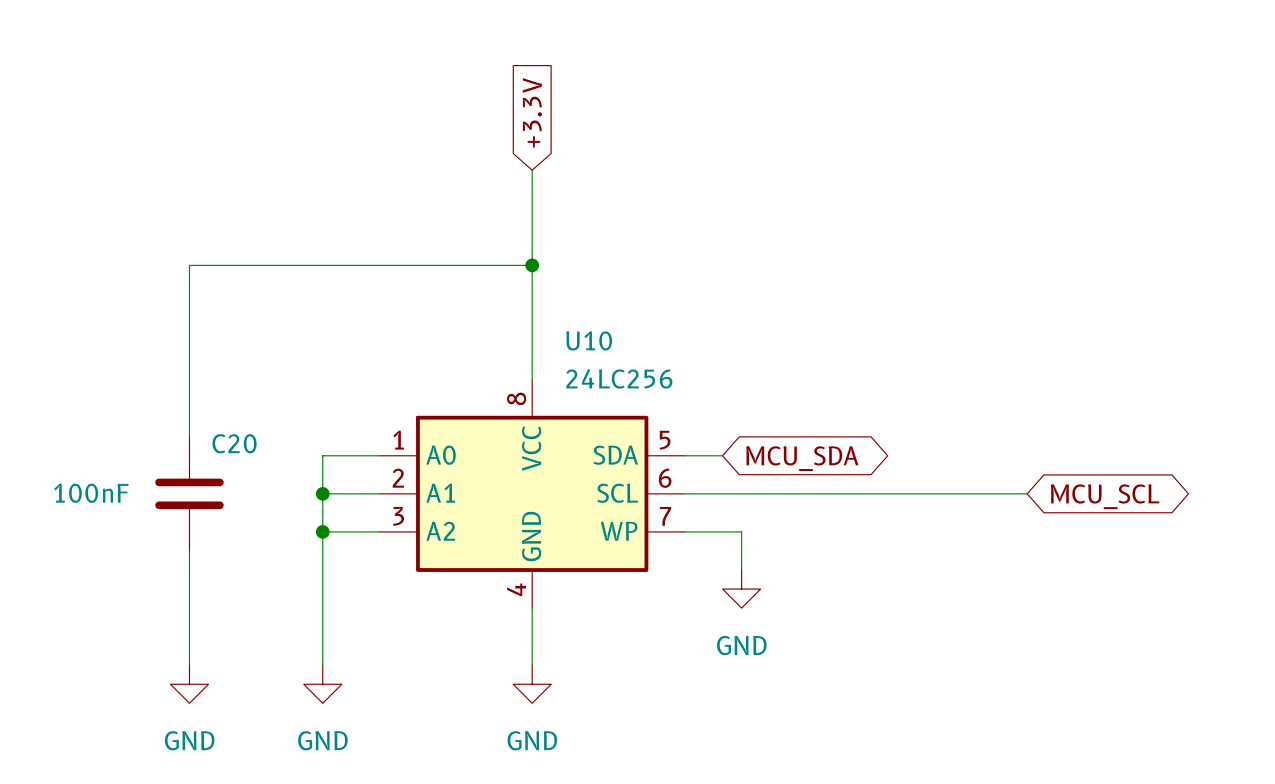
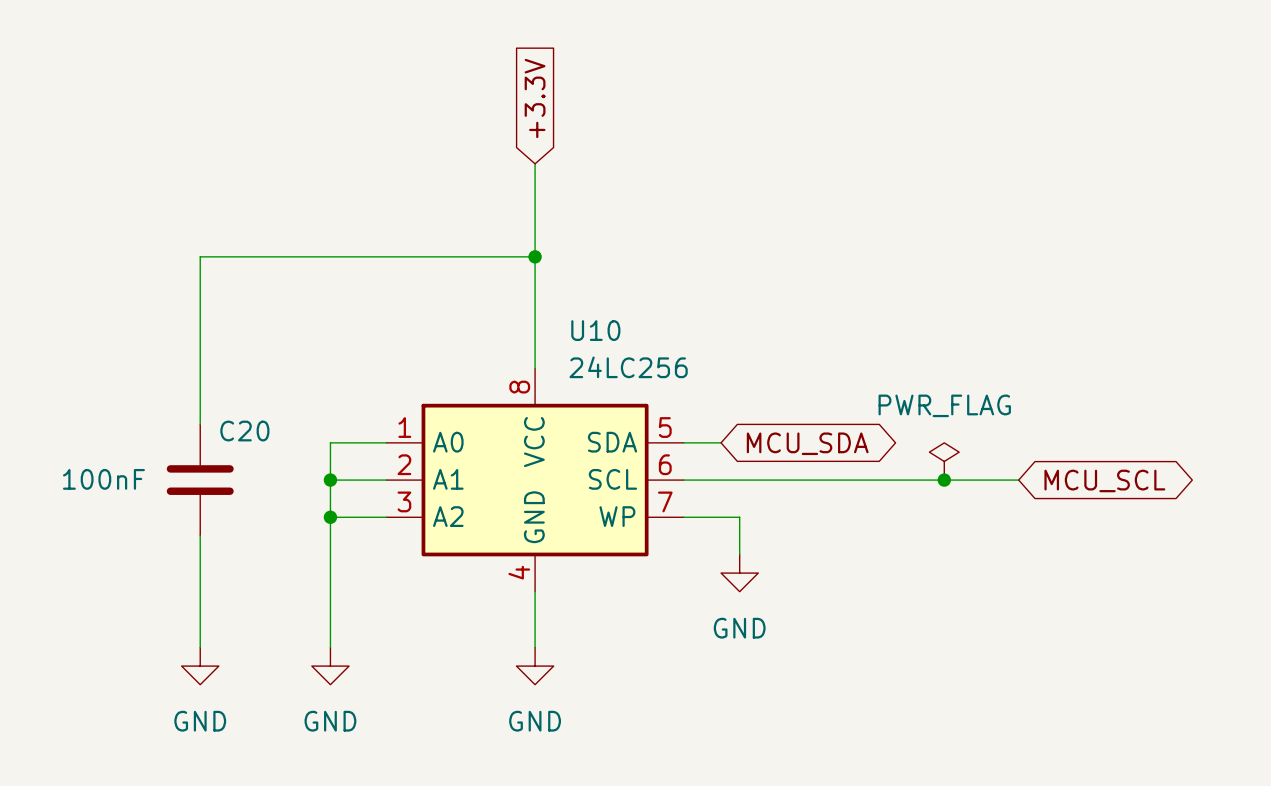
power symbol: none -> PWR_FLAG (944, 461)
junction: none -> (944, 480)

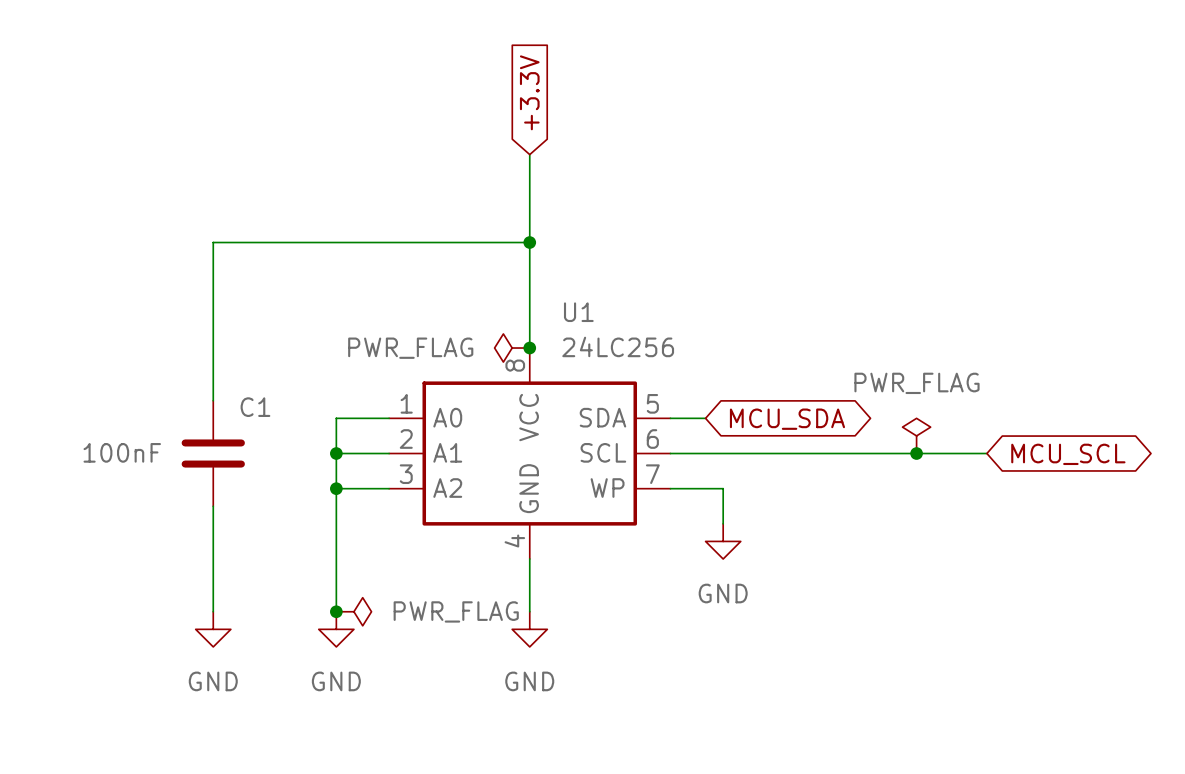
U10 name: U10 (595, 330) -> U1 (578, 312)
power symbol: none -> PWR_FLAG (512, 348)
junction: none -> (529, 348)
C20 name: C20 (244, 431) -> C1 (255, 407)
junction: none -> (336, 611)
power symbol: none -> PWR_FLAG (353, 611)

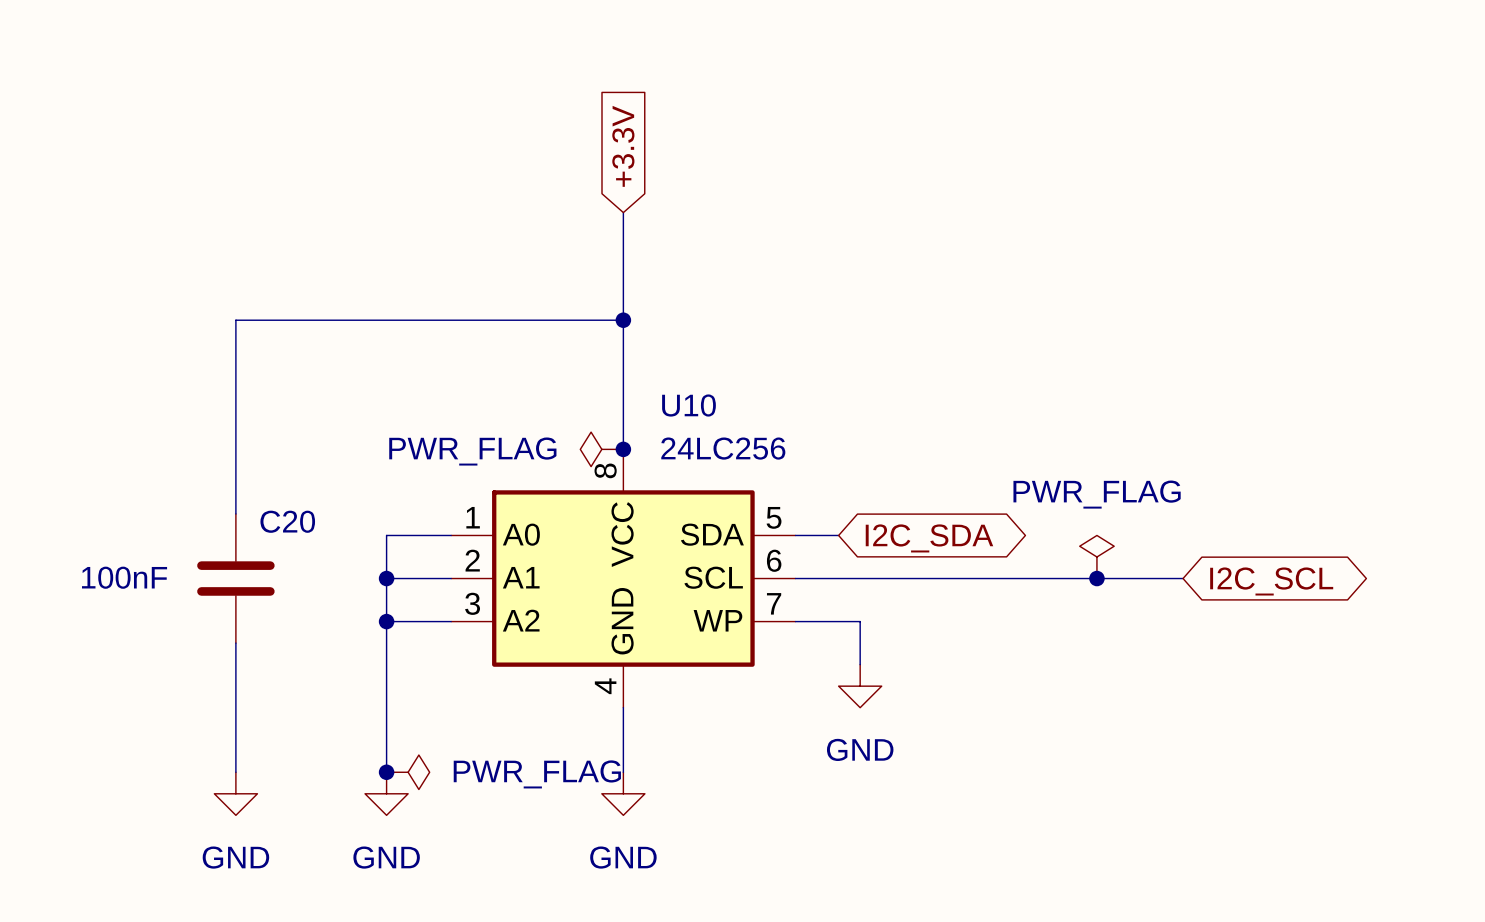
U1 name: U1 (578, 312) -> U10 (689, 405)
C1 name: C1 (255, 407) -> C20 (287, 521)
global label: MCU_SDA (787, 419) -> I2C_SDA (929, 538)
global label: MCU_SCL (1068, 454) -> I2C_SCL (1271, 581)

